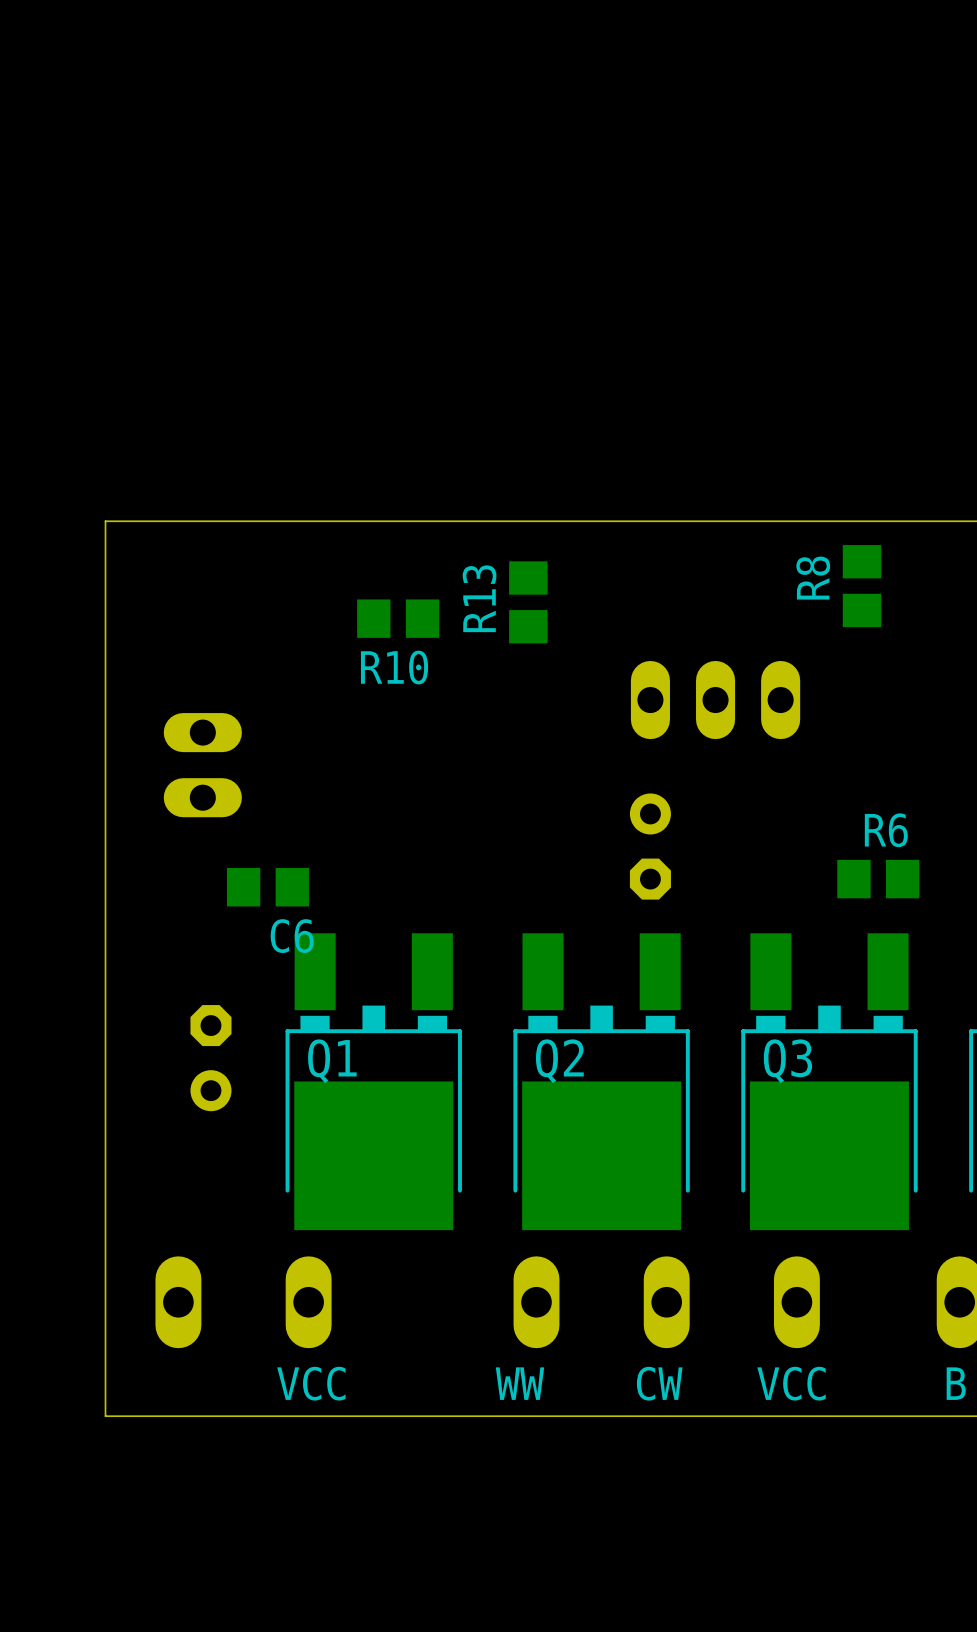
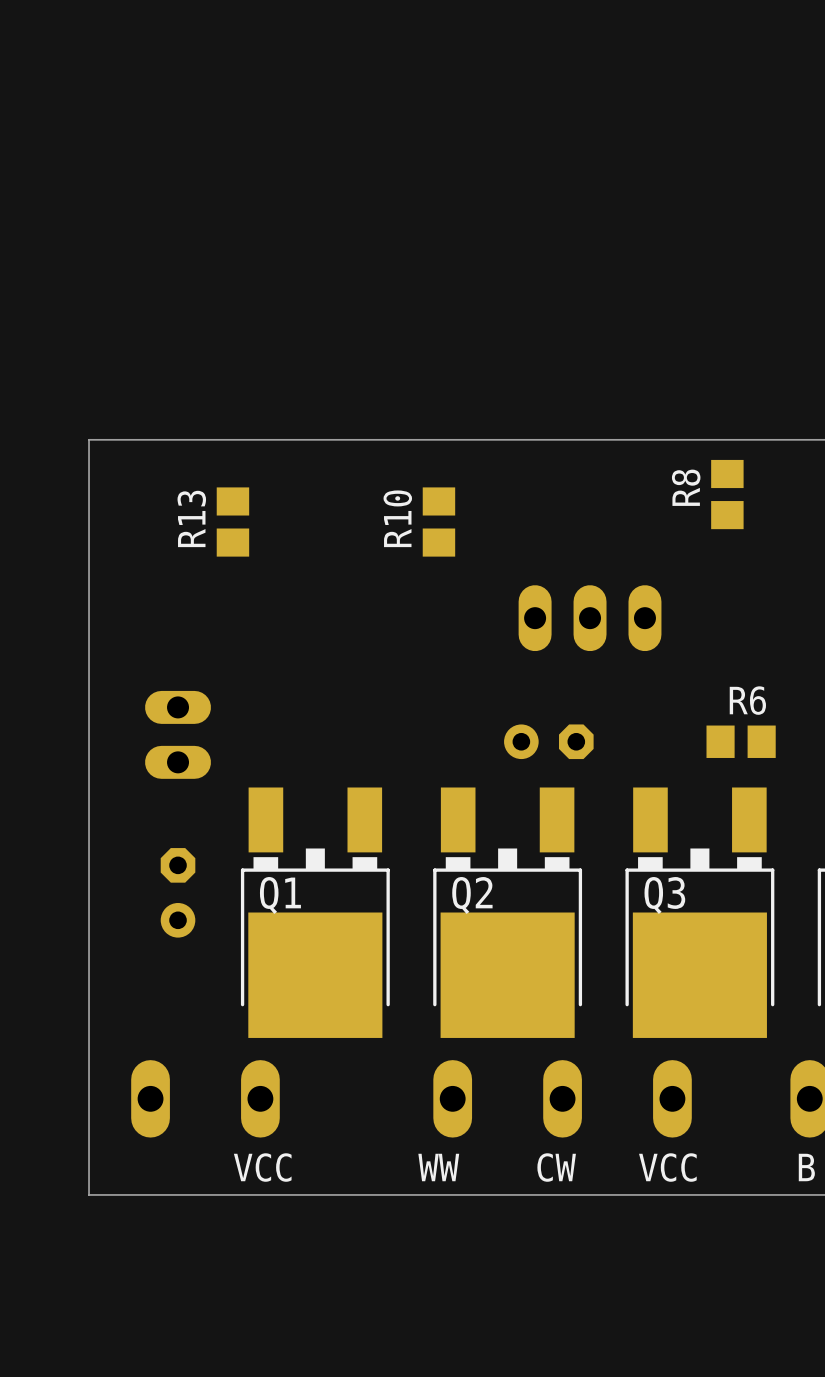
R13 position: (528, 602) -> (232, 522)
R10 rotation: 0° (398, 618) -> 90° clockwise (438, 522)
R10 position: (398, 618) -> (438, 522)
part position: (715, 700) -> (590, 618)
part position: (202, 765) -> (178, 734)
part rotation: 0° (650, 846) -> 90° counterclockwise (548, 741)
C6: (267, 887) -> none

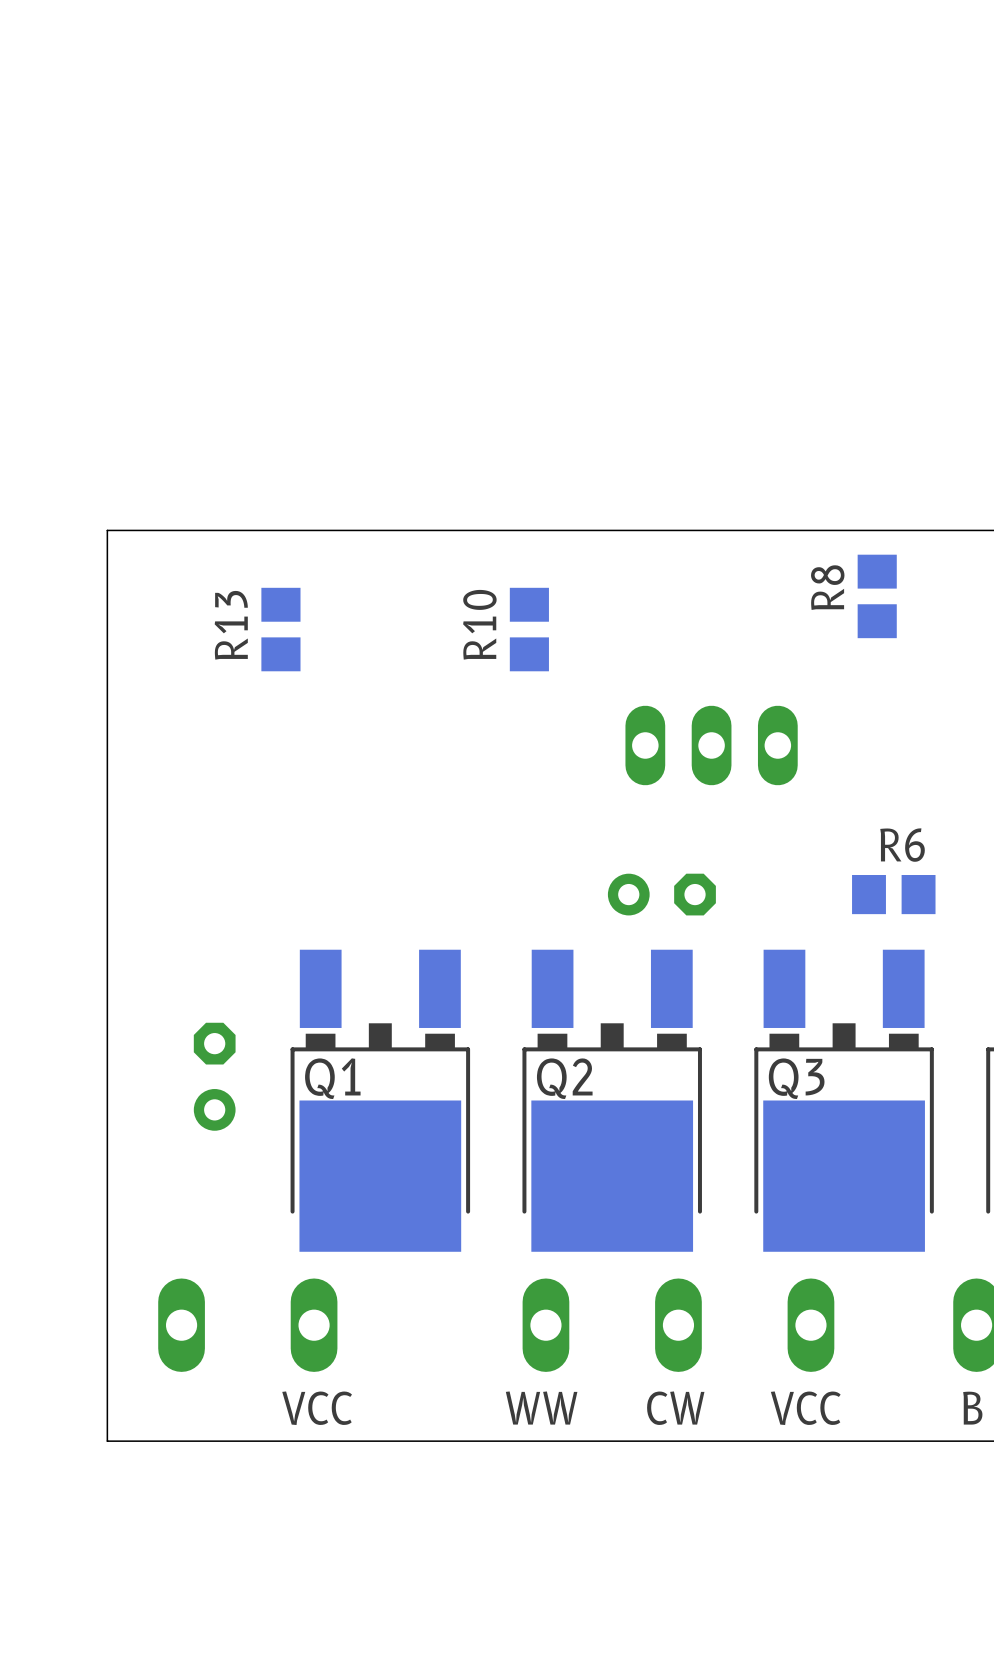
part: (178, 734) -> none

